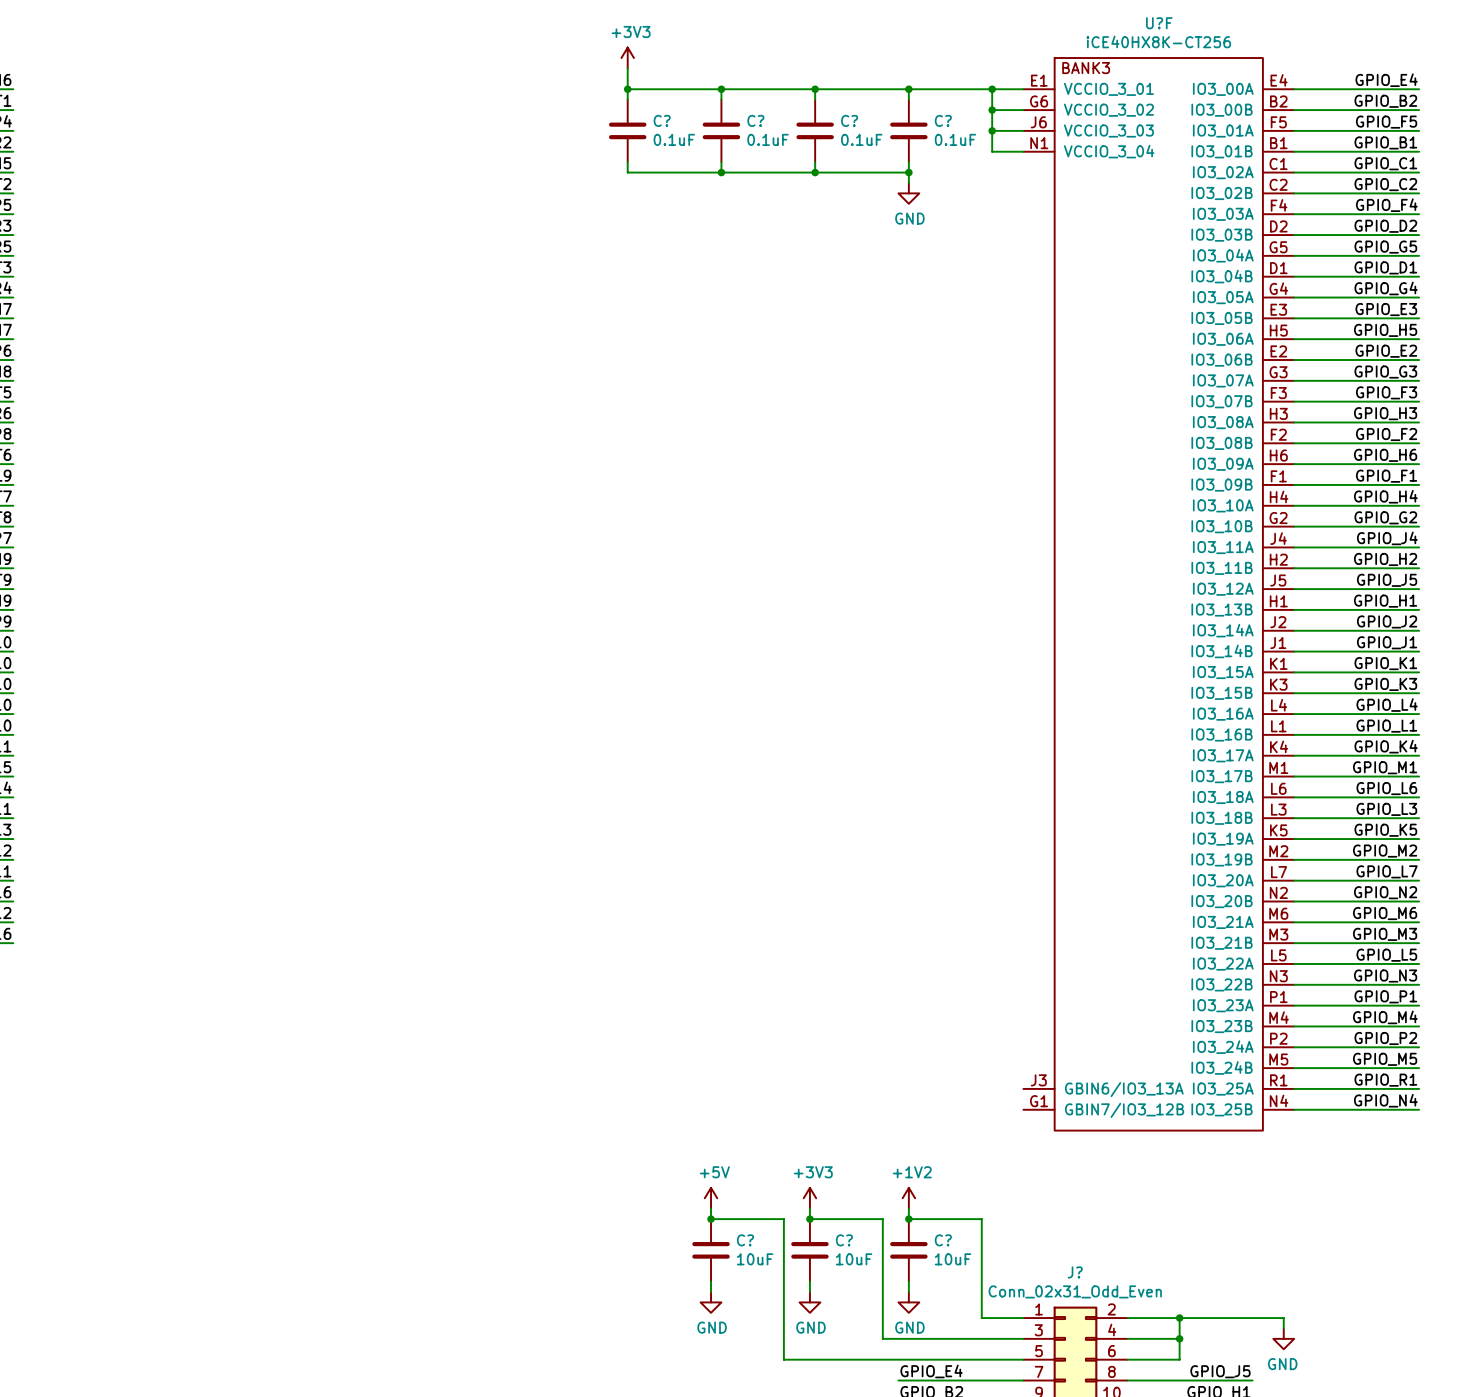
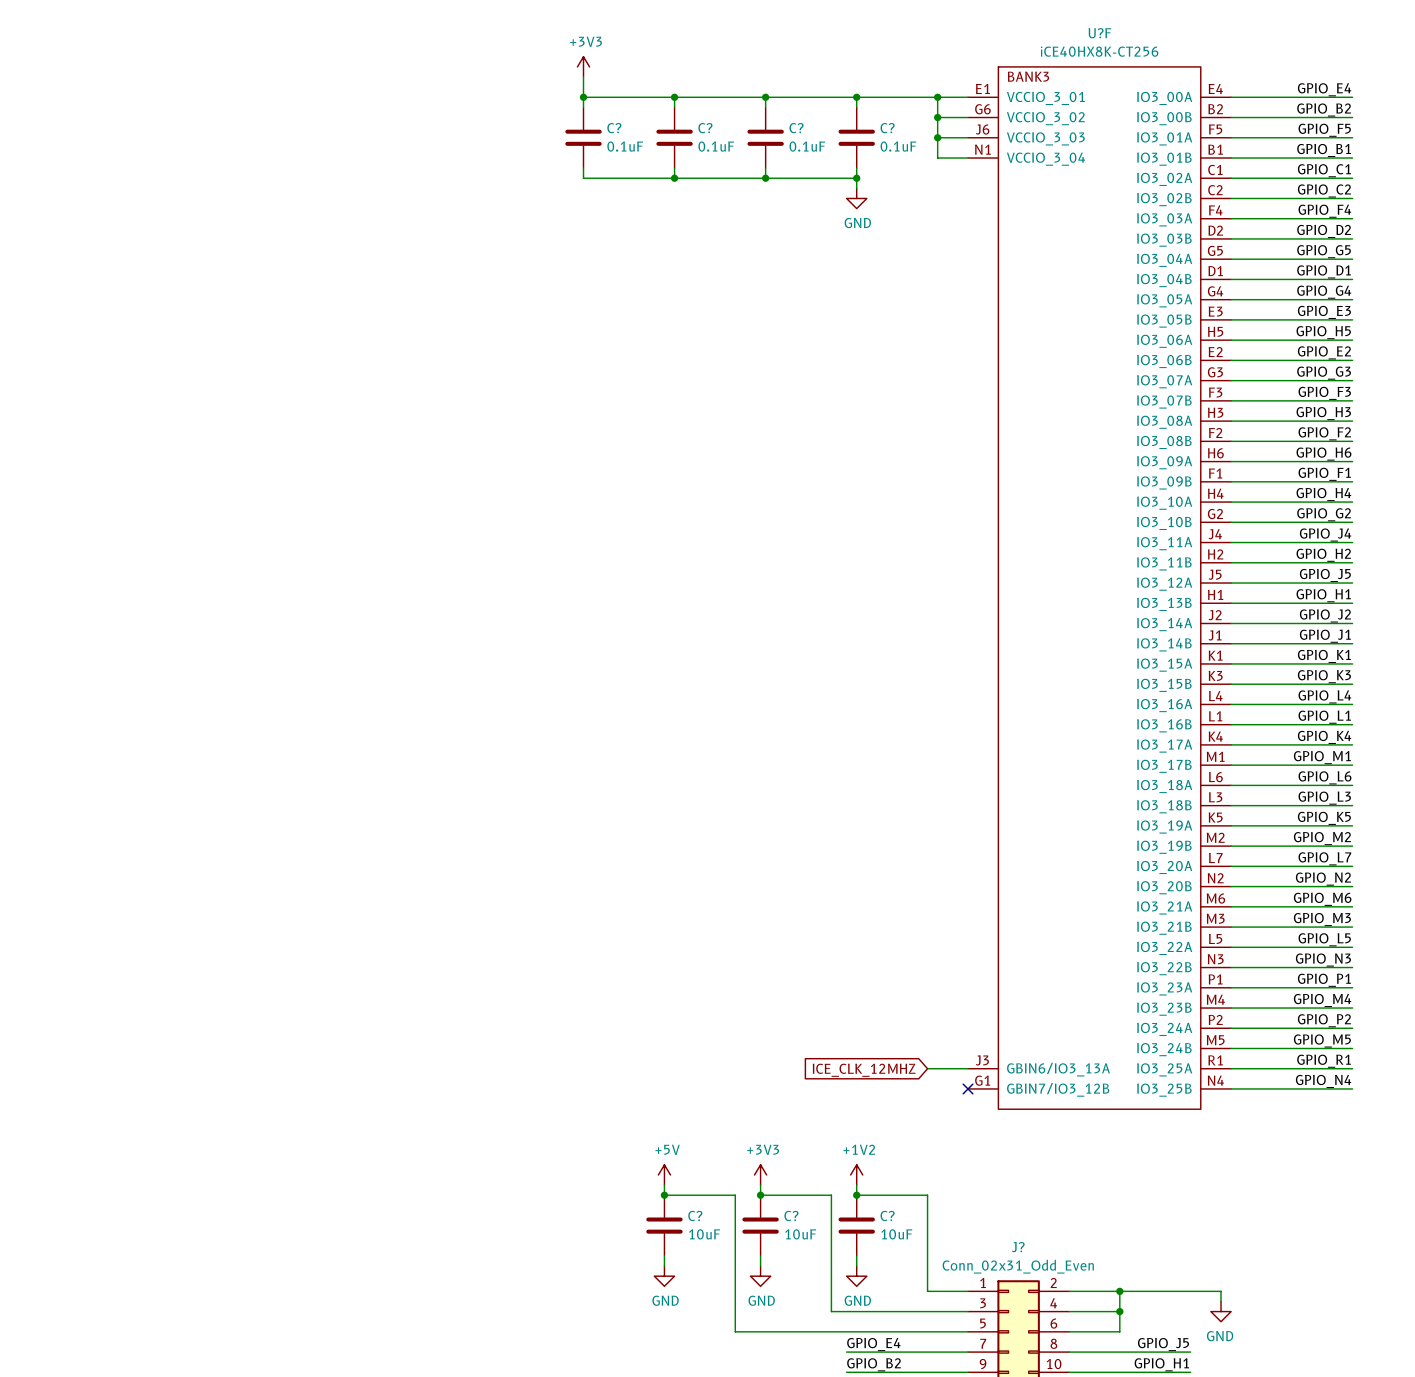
wire: none -> (927, 1068) (968, 1068)
global label: none -> ICE_CLK_12MHZ (864, 1070)
no-connect mark: none -> (968, 1088)

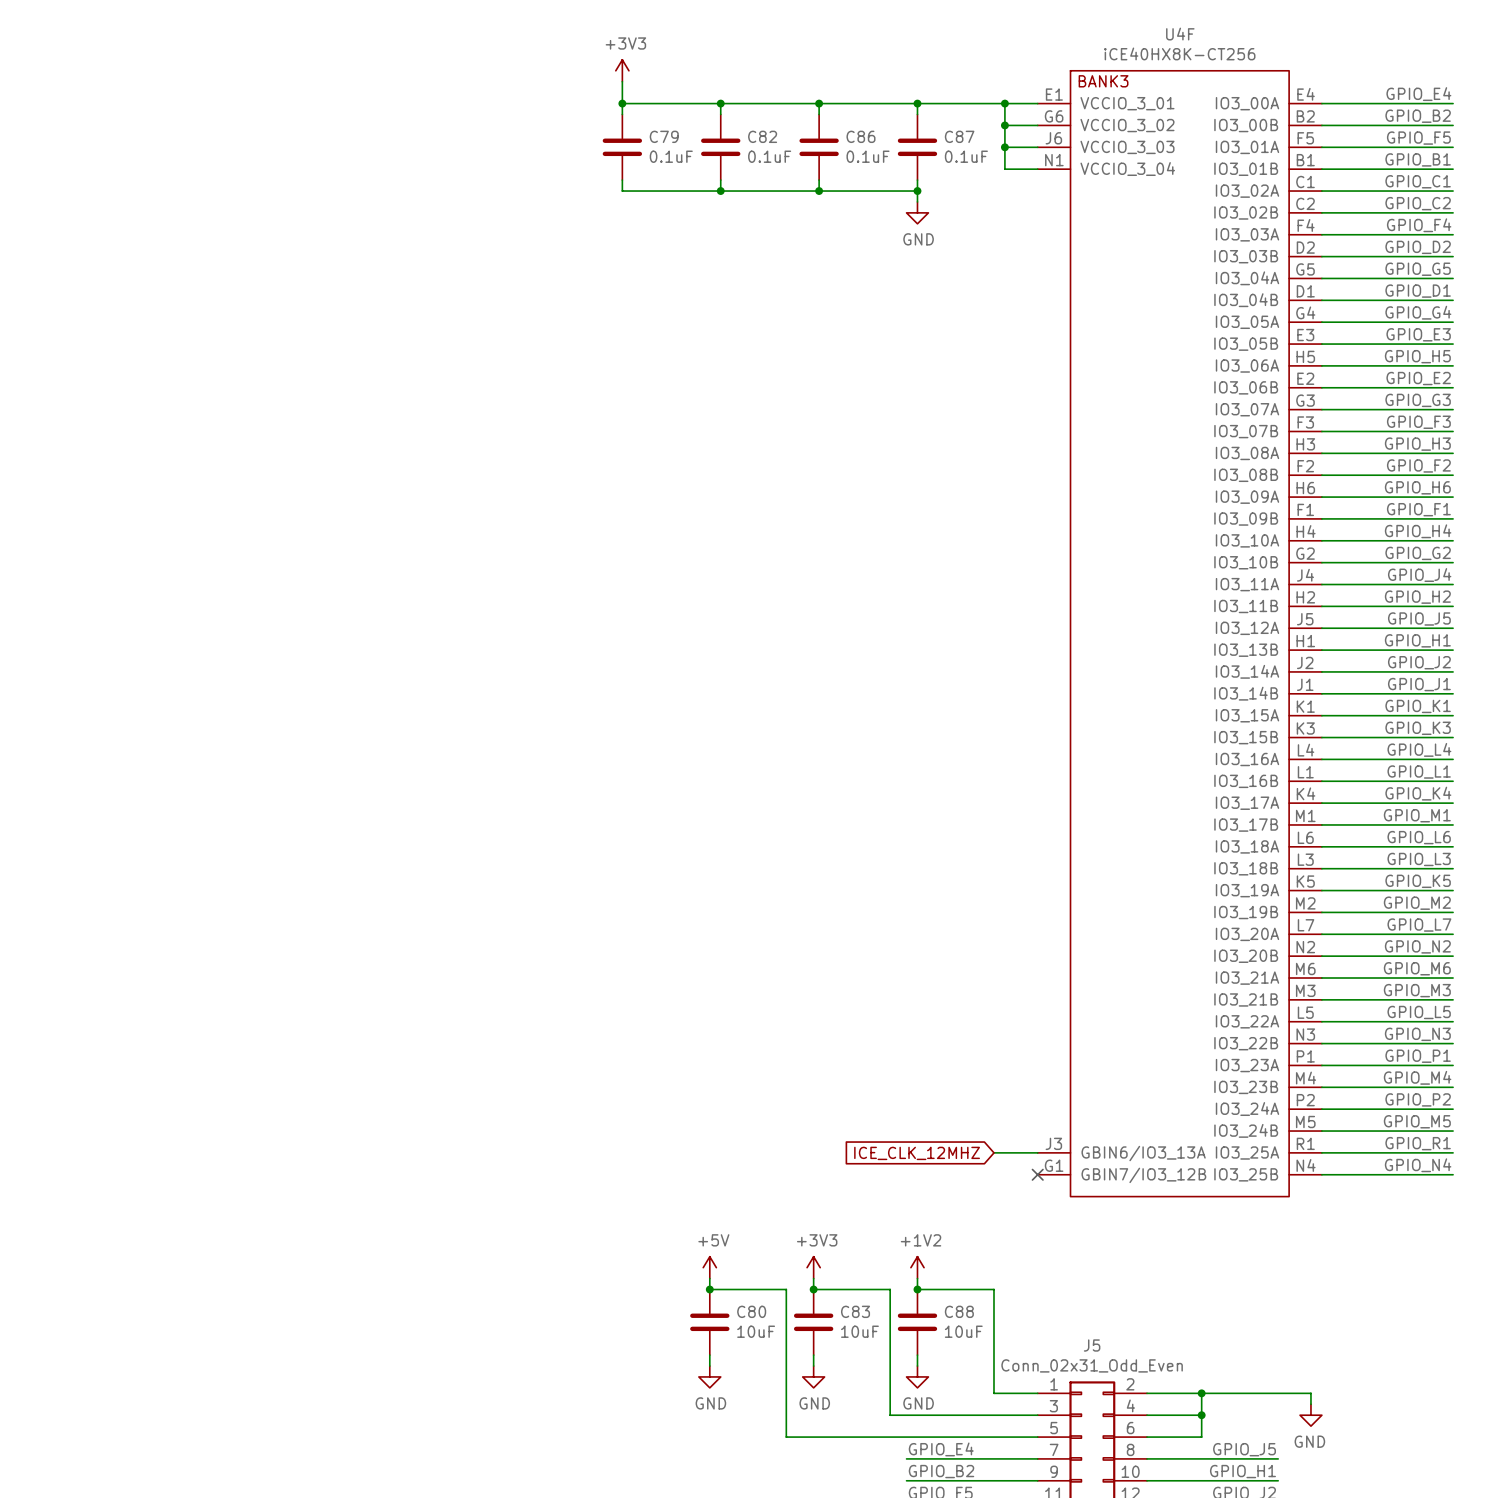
U?F name: U?F (1099, 33) -> U4F (1180, 34)
C? name: C? (614, 128) -> C79 (664, 136)
C? name: C? (705, 128) -> C82 (762, 136)
C? name: C? (796, 128) -> C86 (860, 136)
C? name: C? (887, 128) -> C87 (959, 136)
C? name: C? (695, 1215) -> C80 (751, 1311)
C? name: C? (791, 1215) -> C83 (855, 1311)
C? name: C? (887, 1215) -> C88 (959, 1311)
J? name: J? (1018, 1247) -> J5 (1092, 1345)

